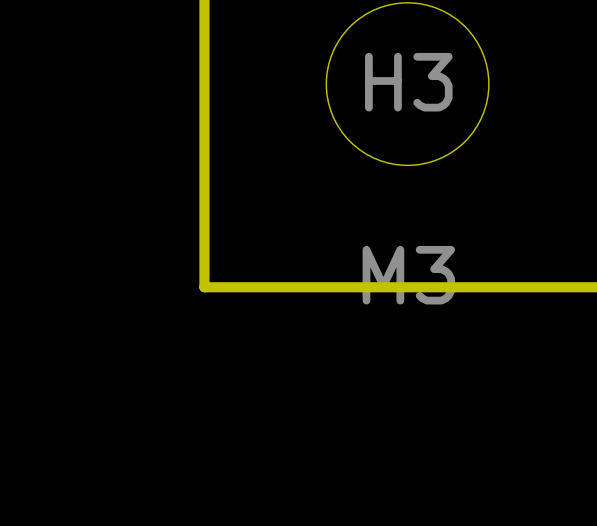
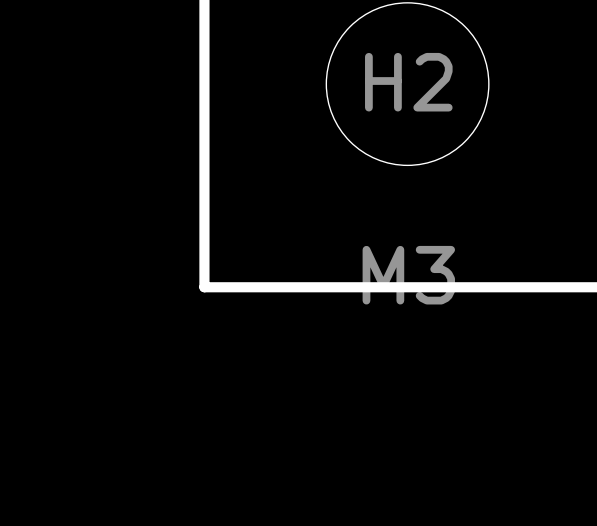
H3 name: H3 (408, 82) -> H2 (408, 82)

